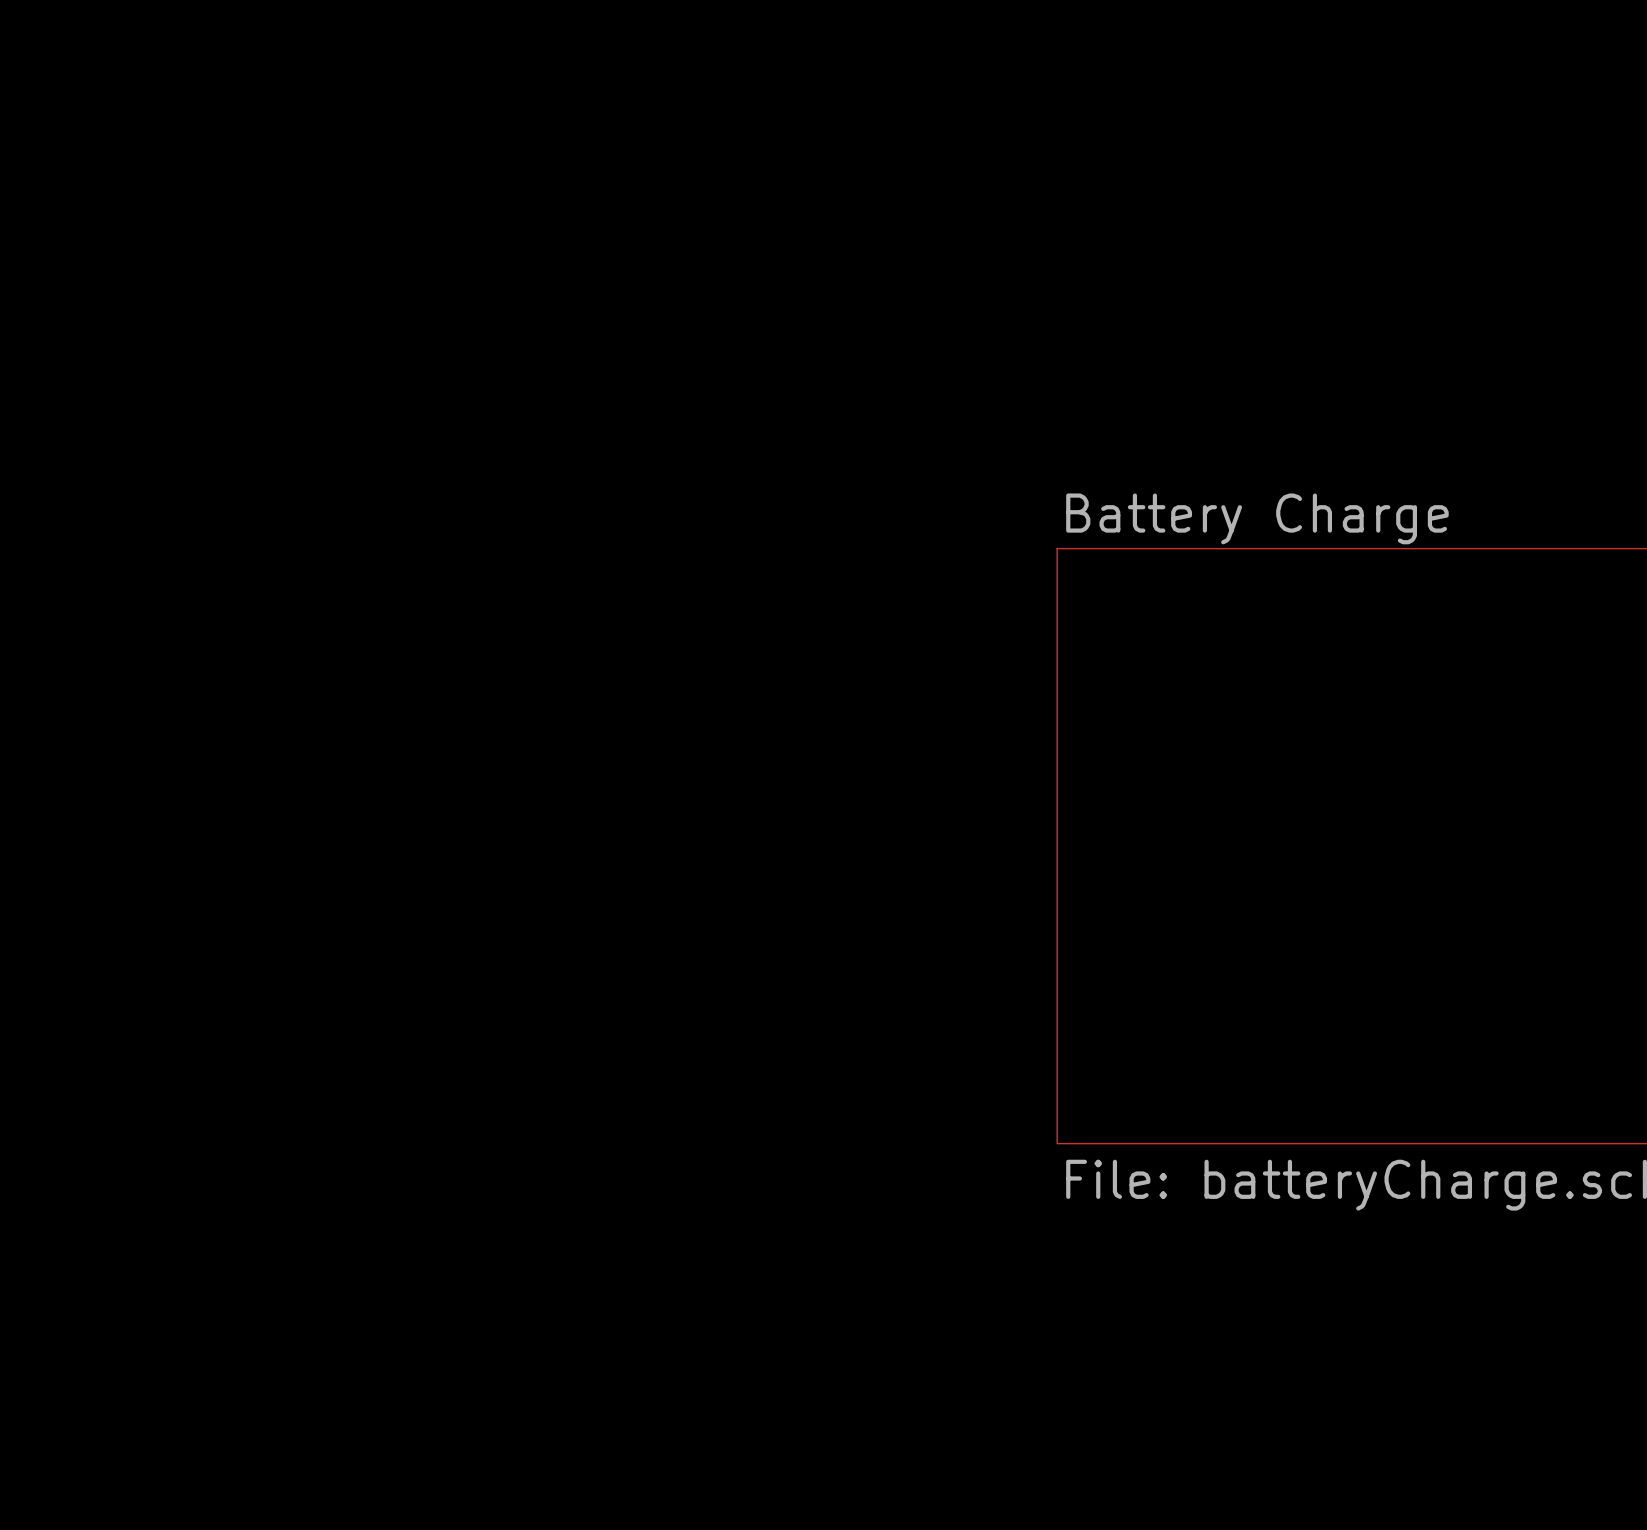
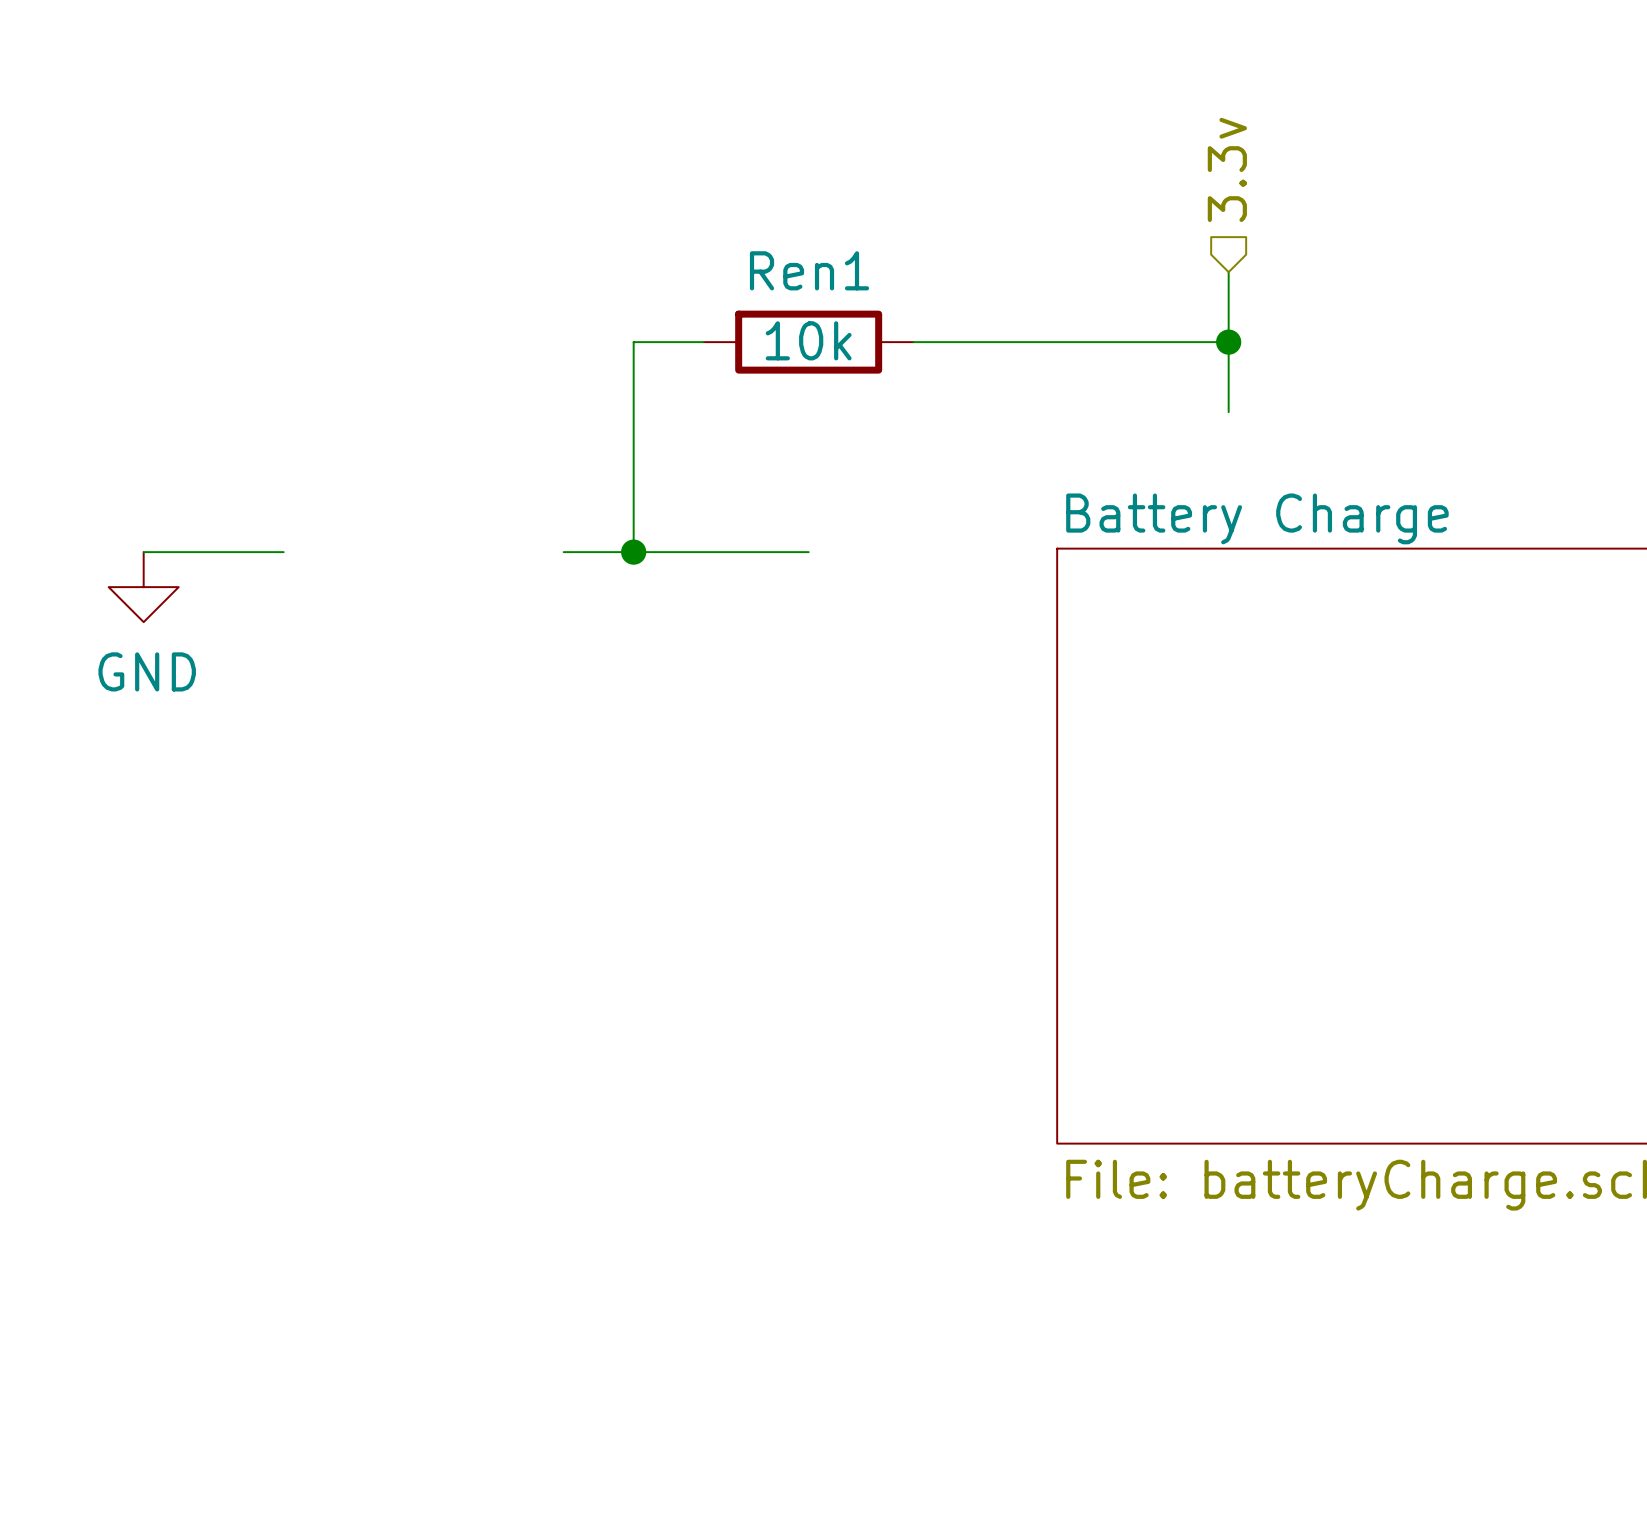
hierarchical label: none -> 3.3v (1227, 169)
wire: none -> (1228, 272) (1228, 412)
wire: none -> (703, 342) (633, 342) (633, 552)
Ren1: none -> 10k (808, 342)
wire: none -> (913, 342) (1228, 342)
junction: none -> (1228, 342)
wire: none -> (143, 552) (283, 552)
wire: none -> (563, 552) (808, 552)
junction: none -> (633, 552)
power symbol: none -> GND (143, 587)

